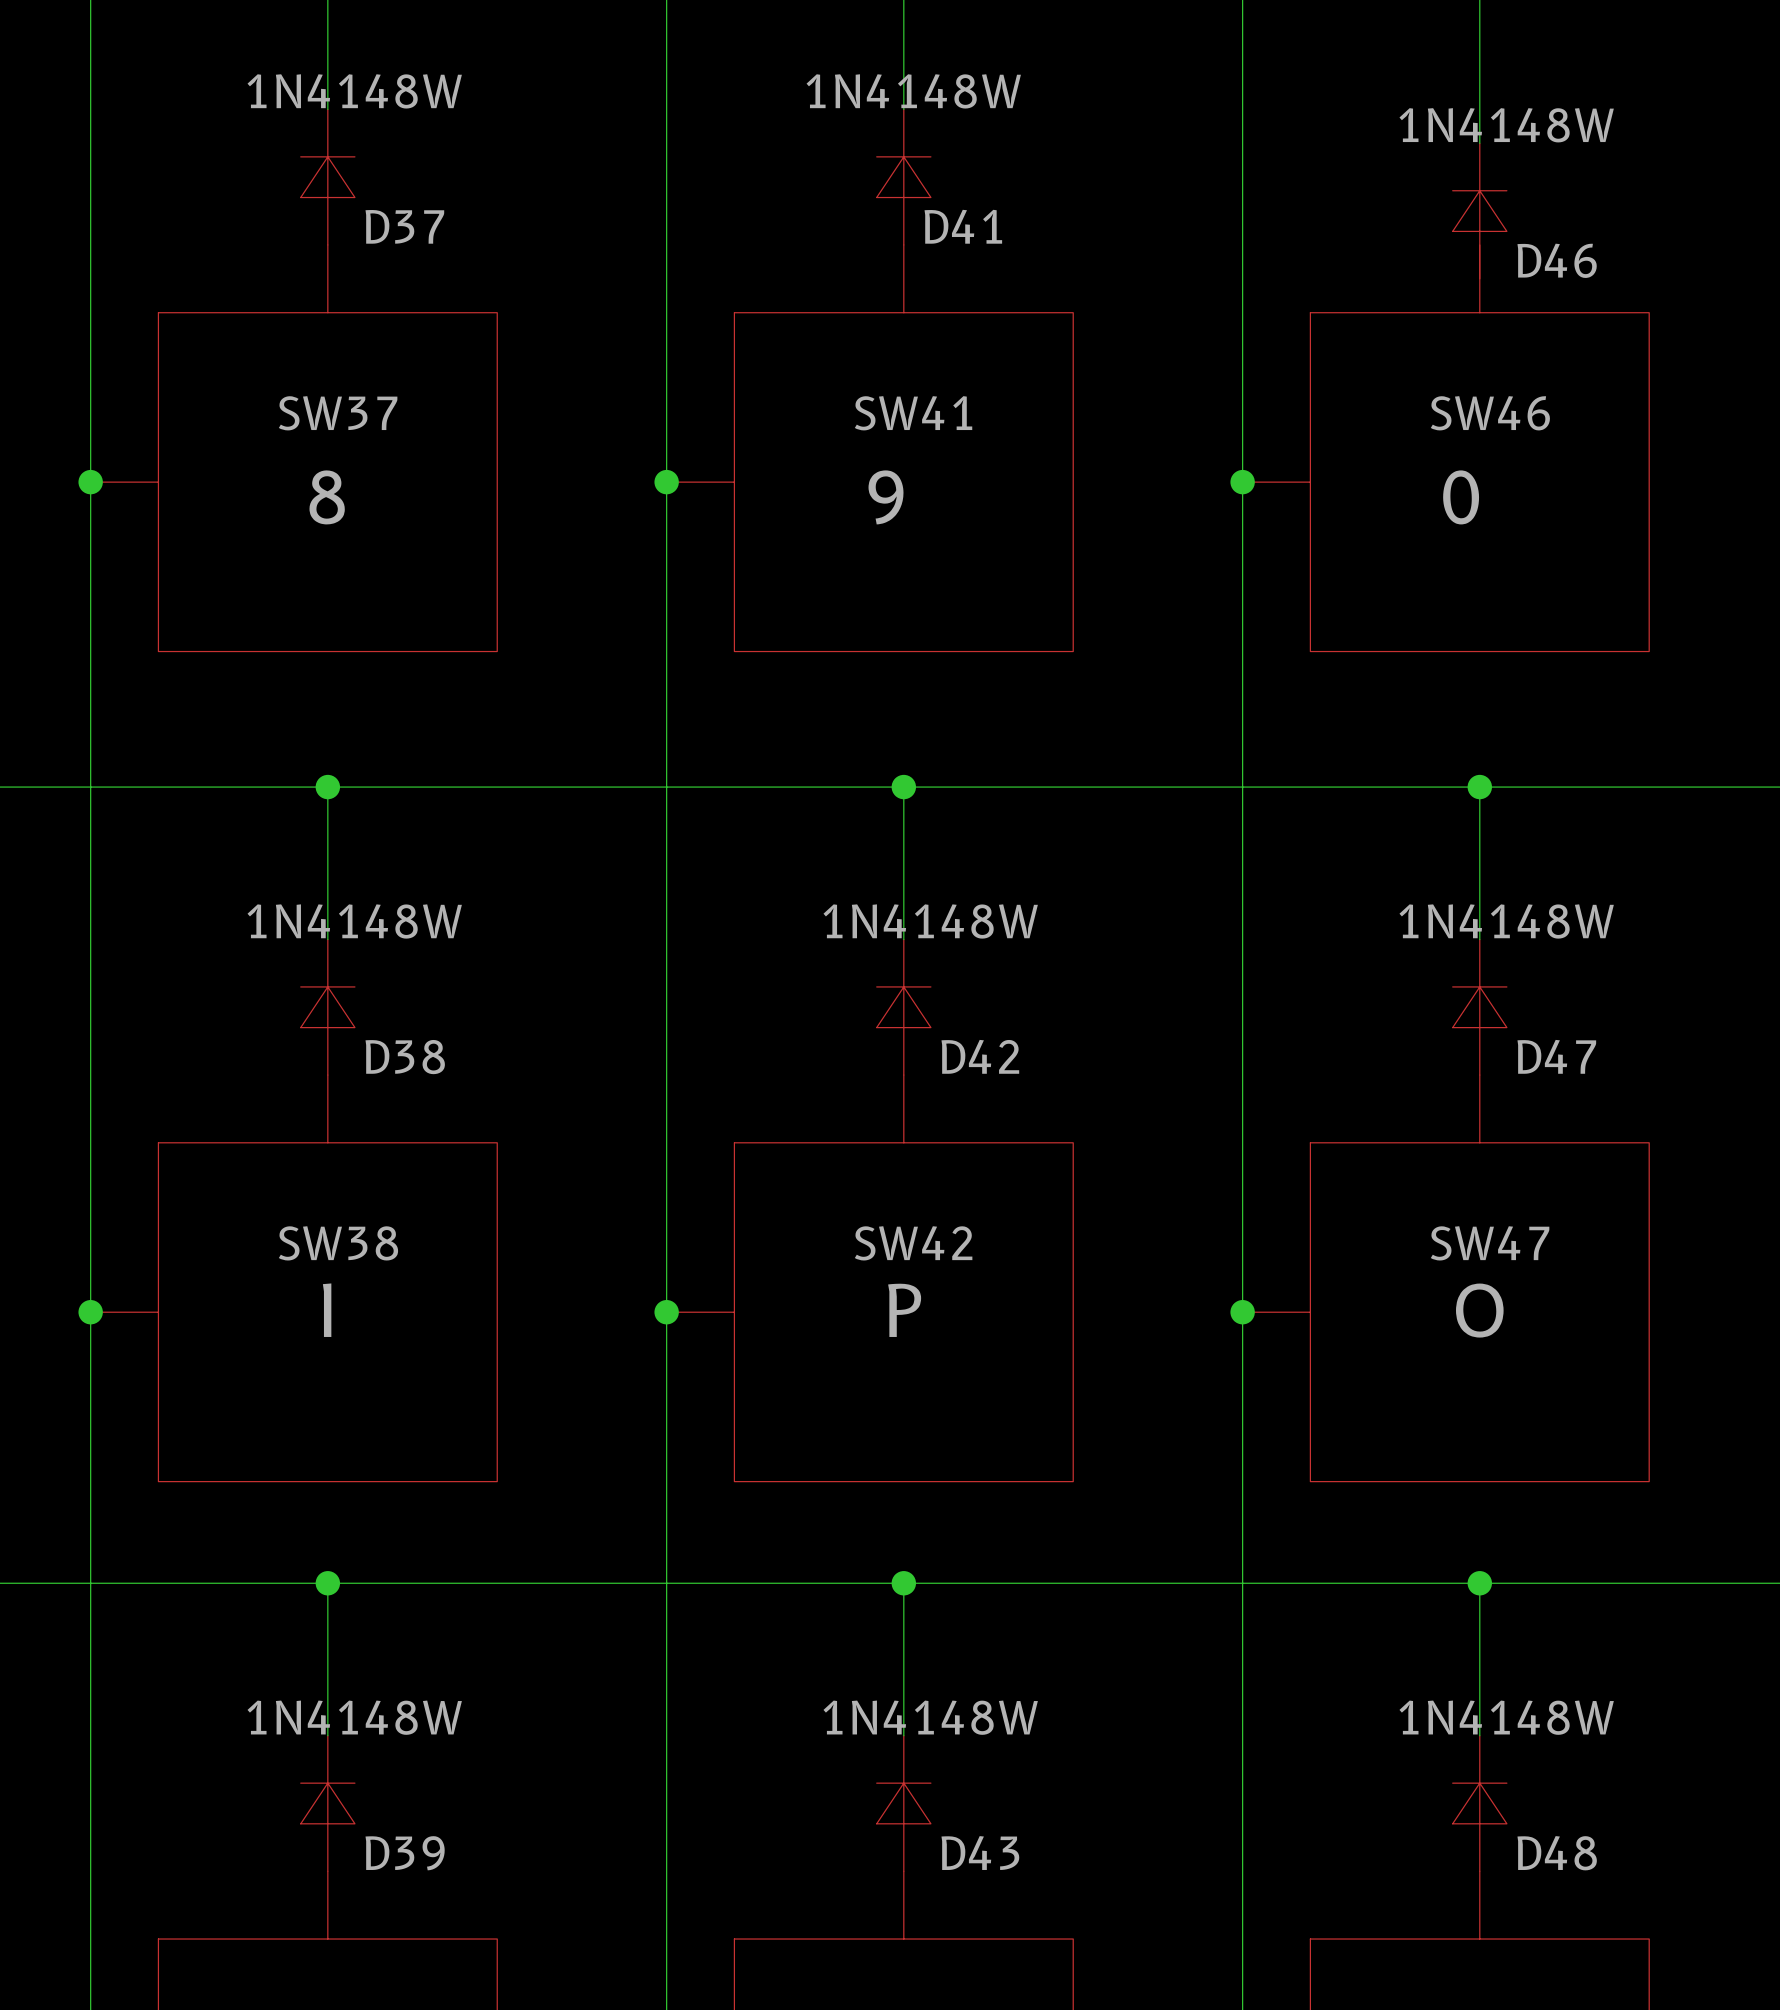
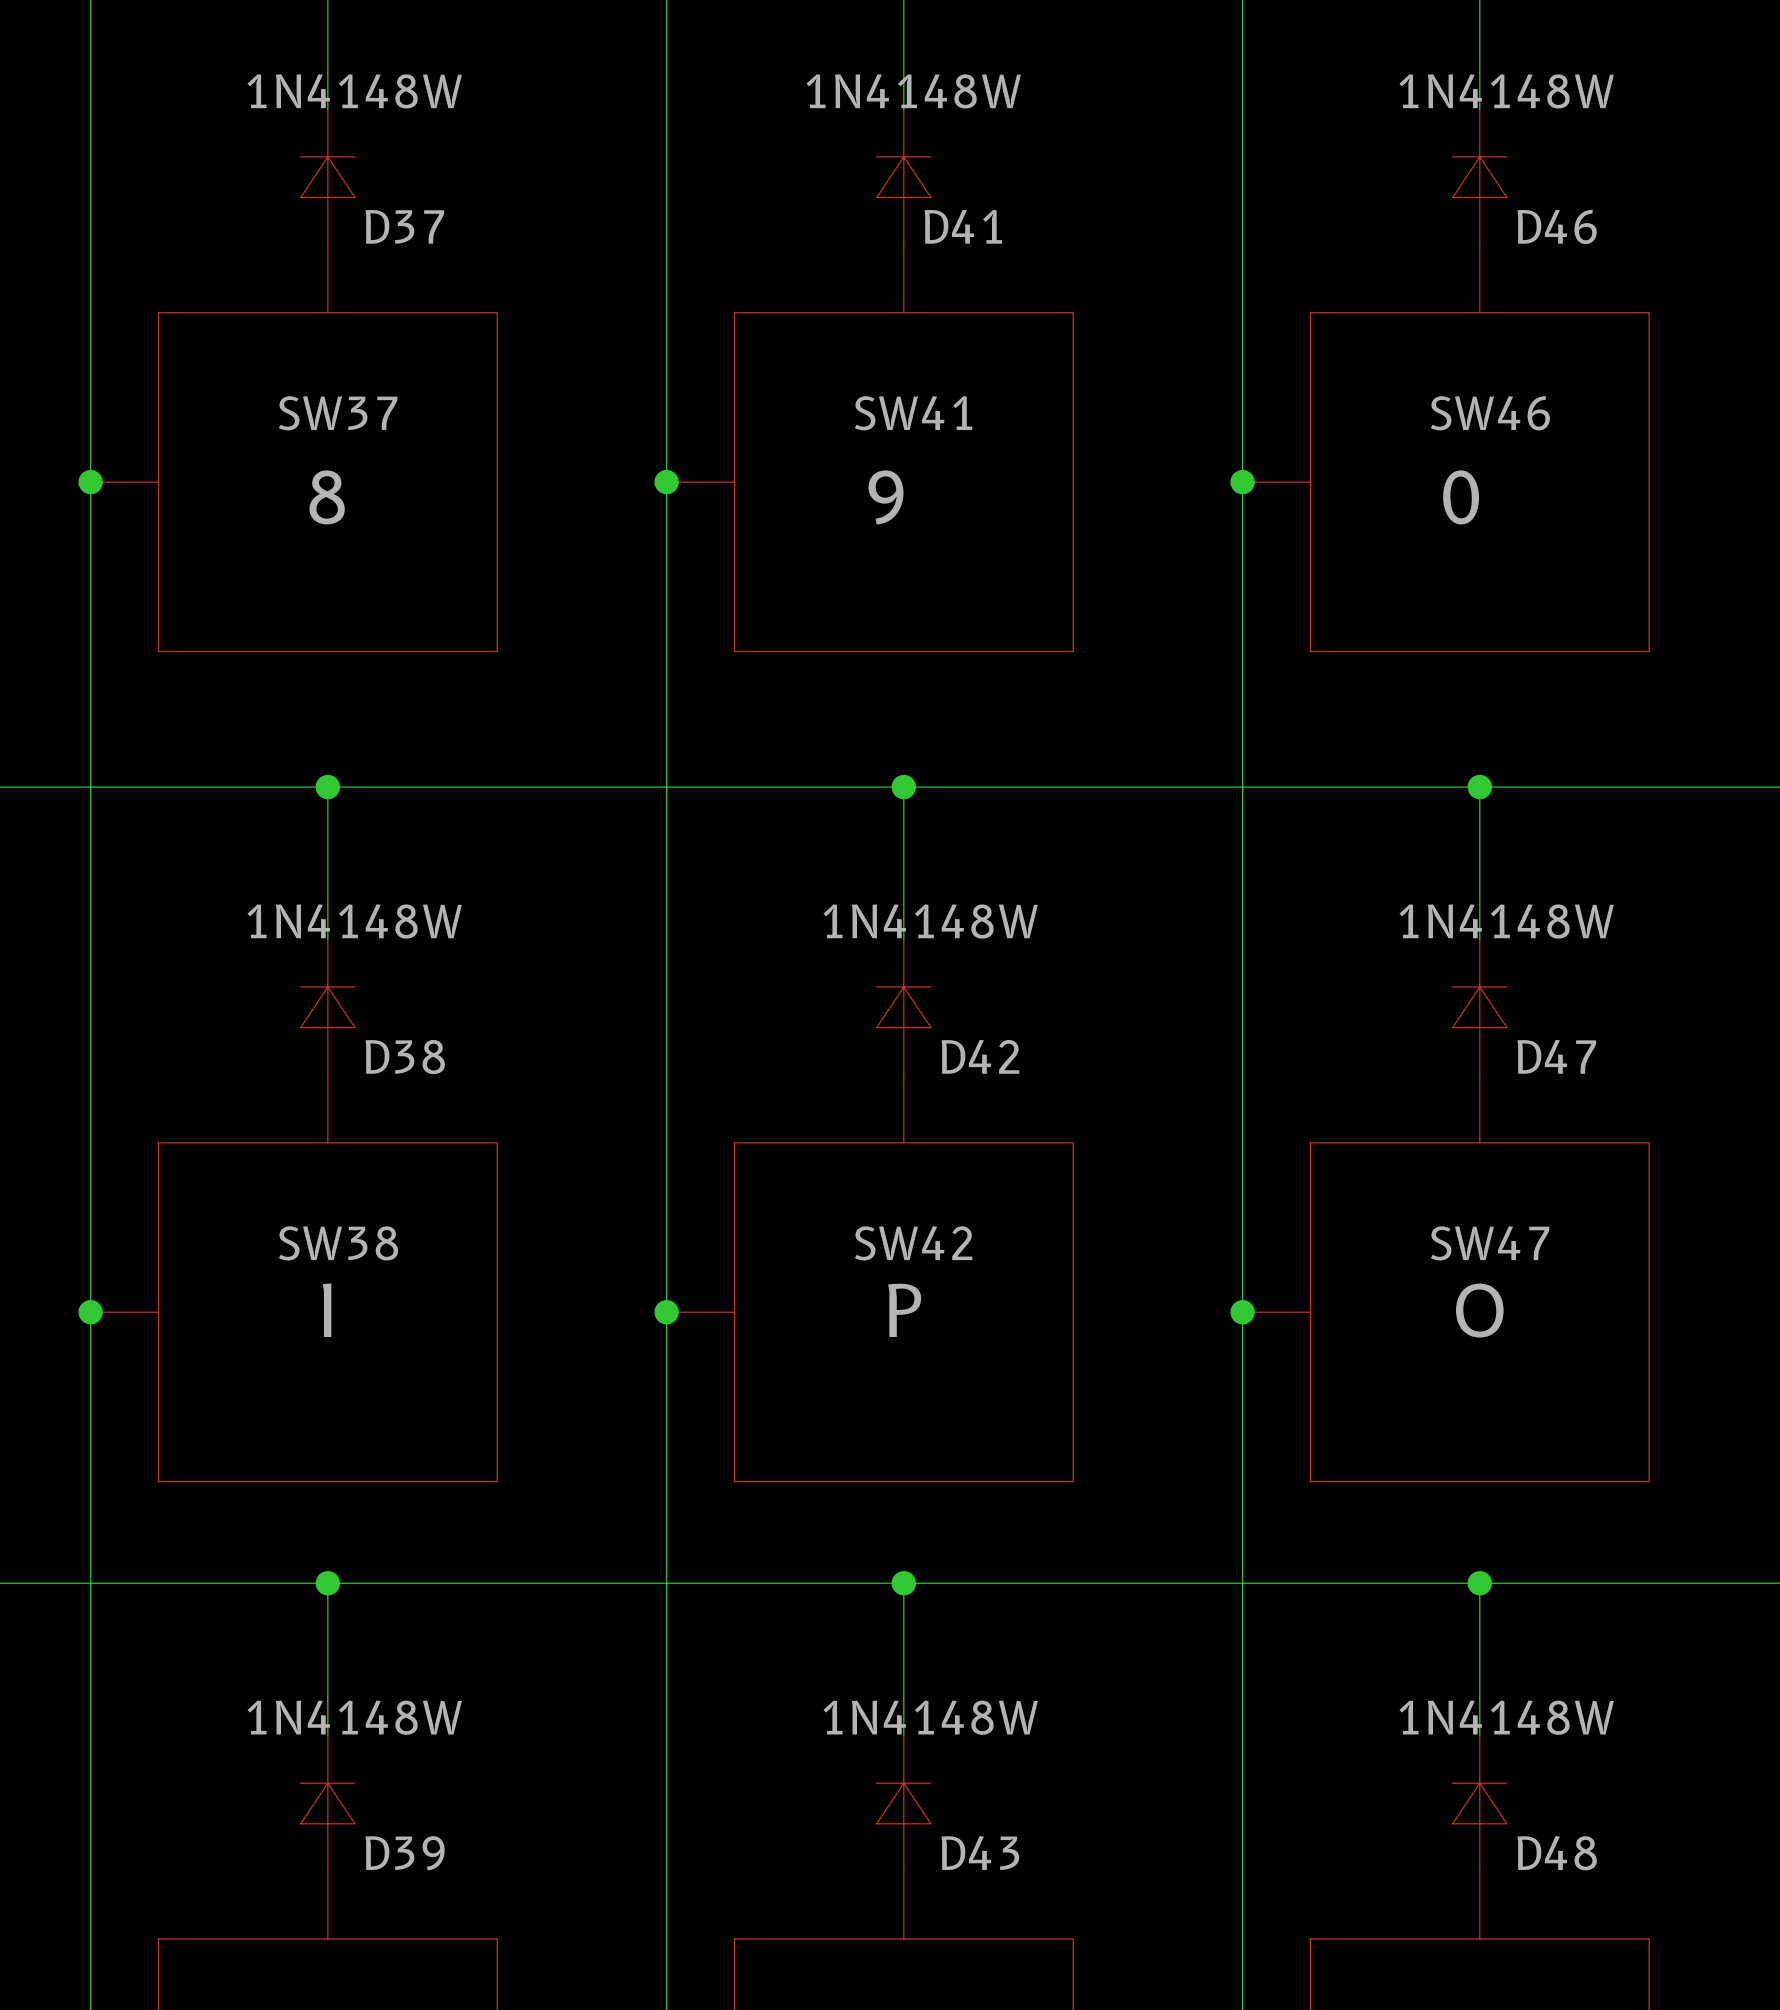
D46 position: (1479, 211) -> (1479, 177)

